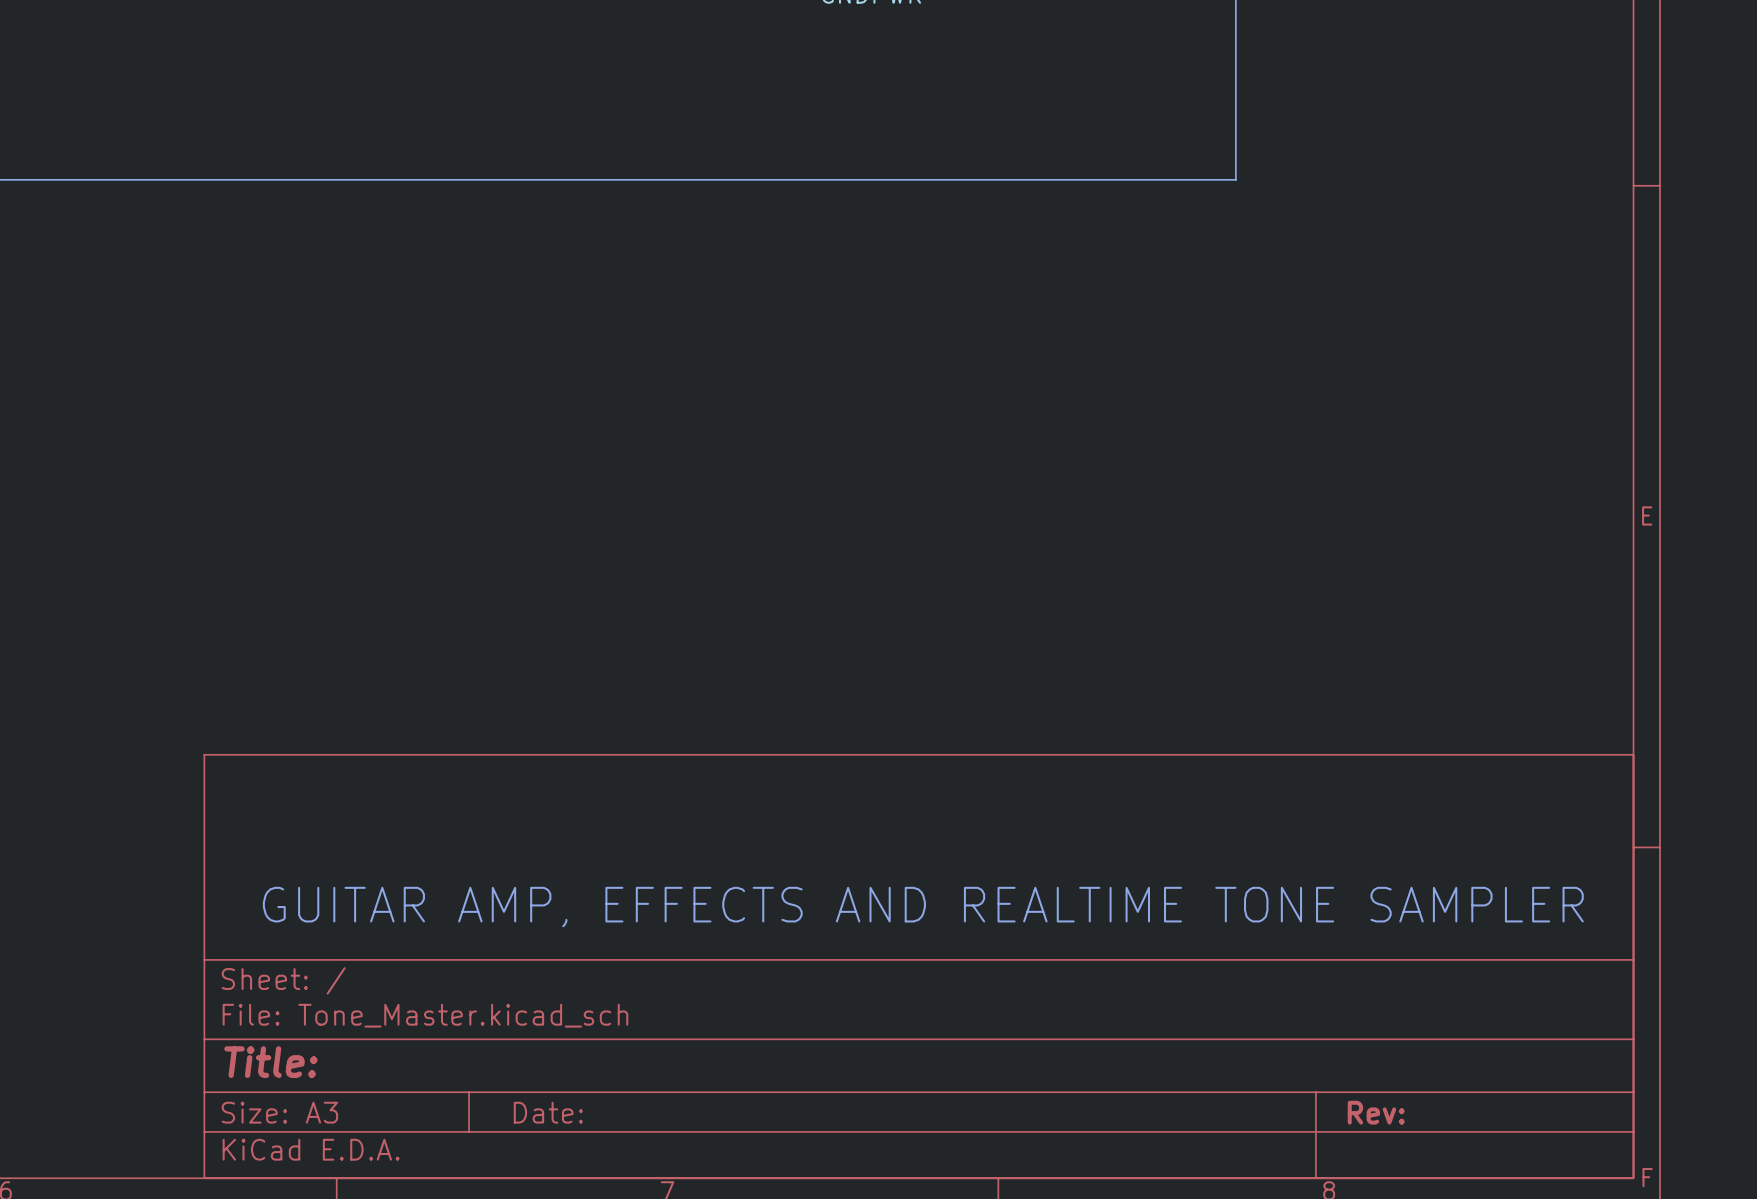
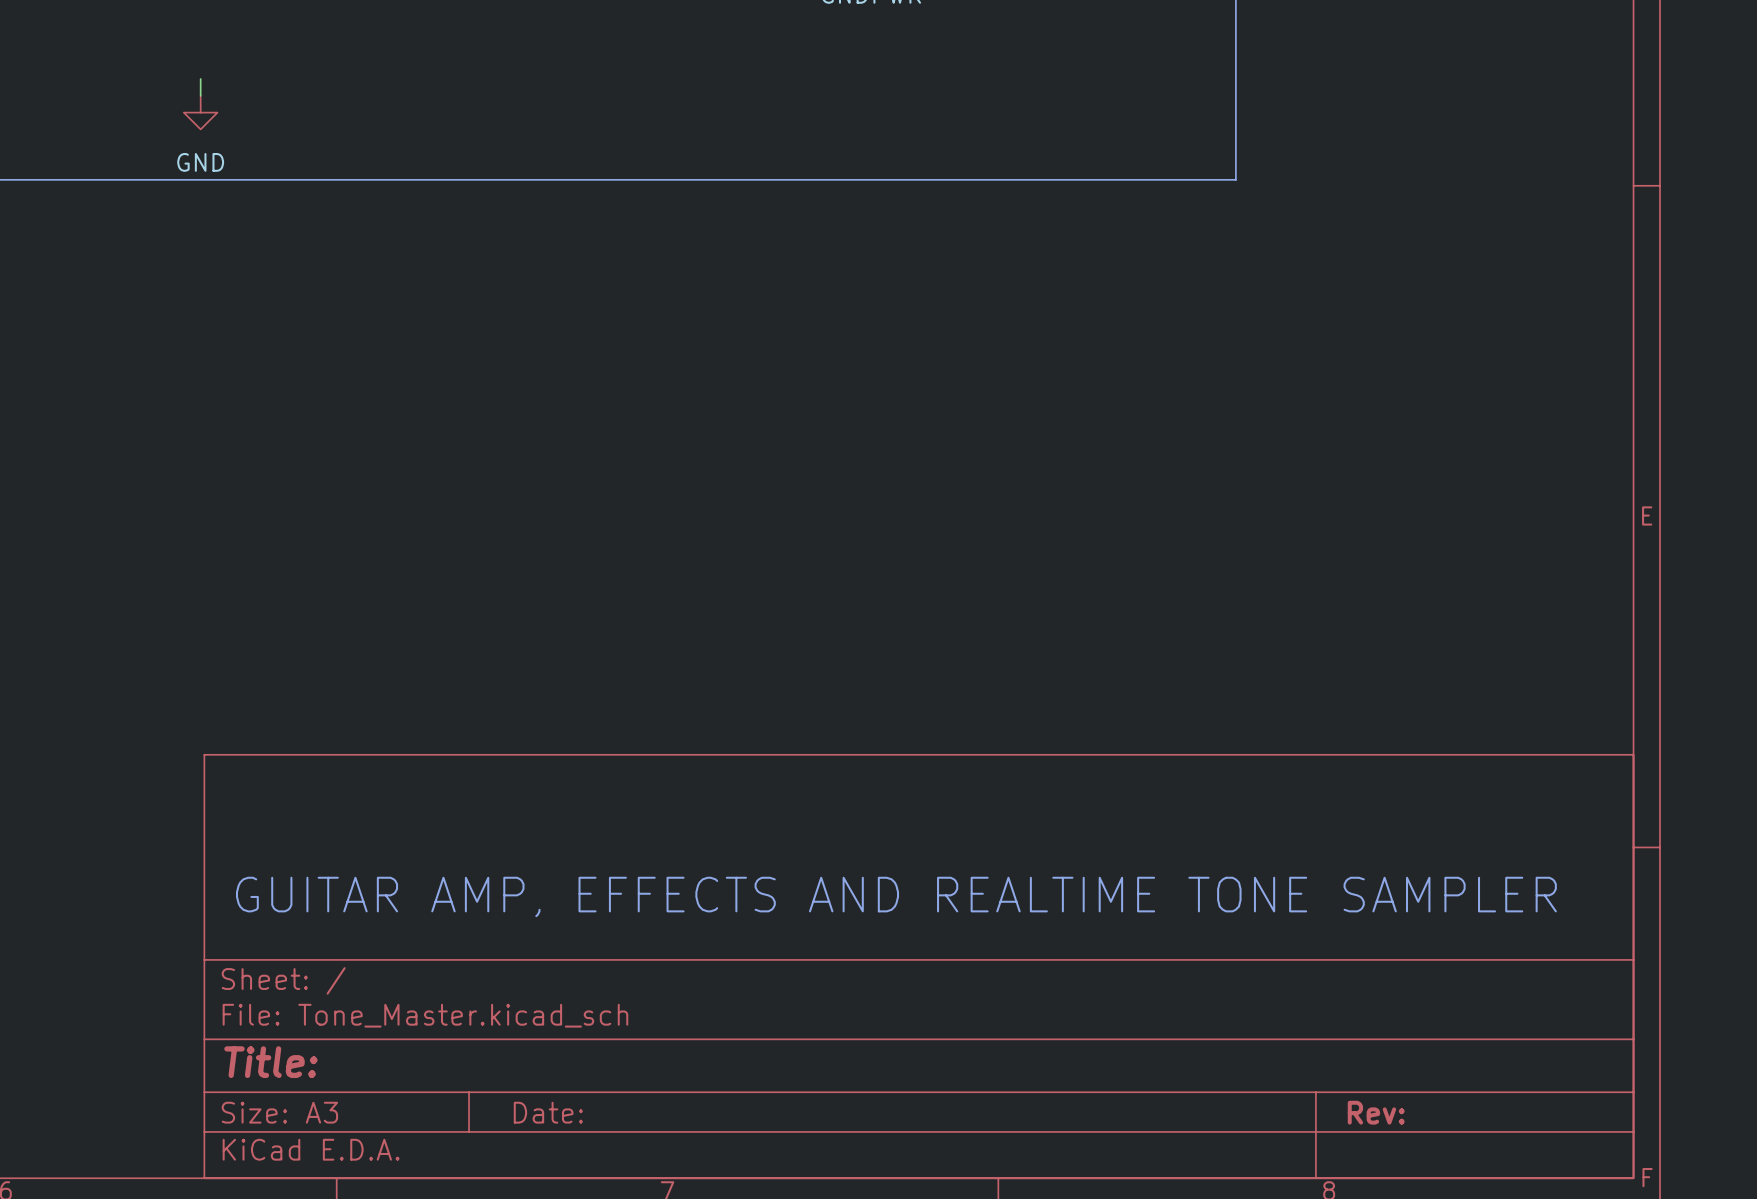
wire: none -> (200, 79) (200, 95)
power symbol: none -> GND (200, 112)
text position: GUITAR AMP, EFFECTS AND REALTIME TONE SAMPLER (923, 907) -> GUITAR AMP, EFFECTS AND REALTIME TONE SAMPLER (896, 896)

